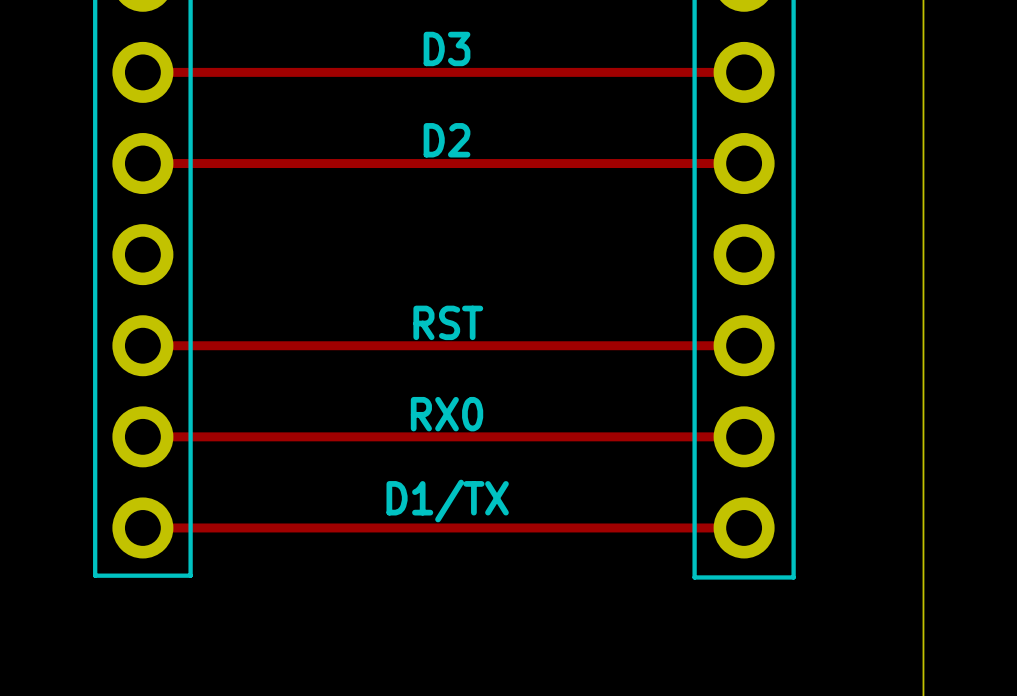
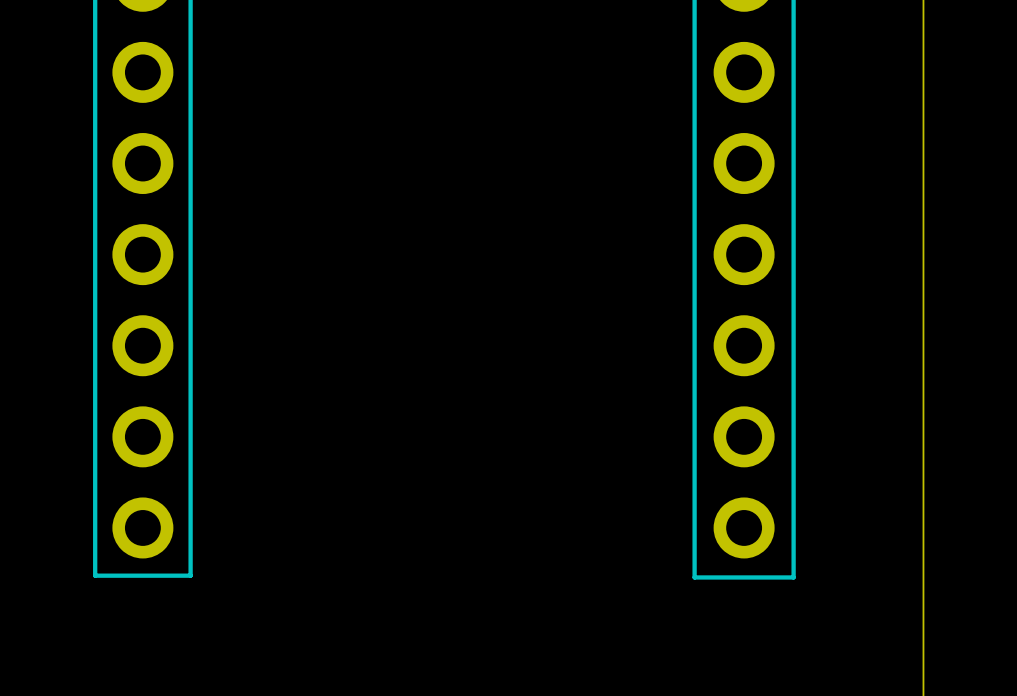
text: D3 (447, 48) -> none
track: (142, 72) (744, 72) -> none
text: D2 (447, 140) -> none
track: (142, 163) (744, 163) -> none
text: RST (448, 322) -> none
track: (142, 345) (744, 345) -> none
text: RX0 (447, 414) -> none
track: (142, 436) (744, 436) -> none
text: D1/TX (447, 501) -> none
track: (142, 527) (744, 527) -> none

